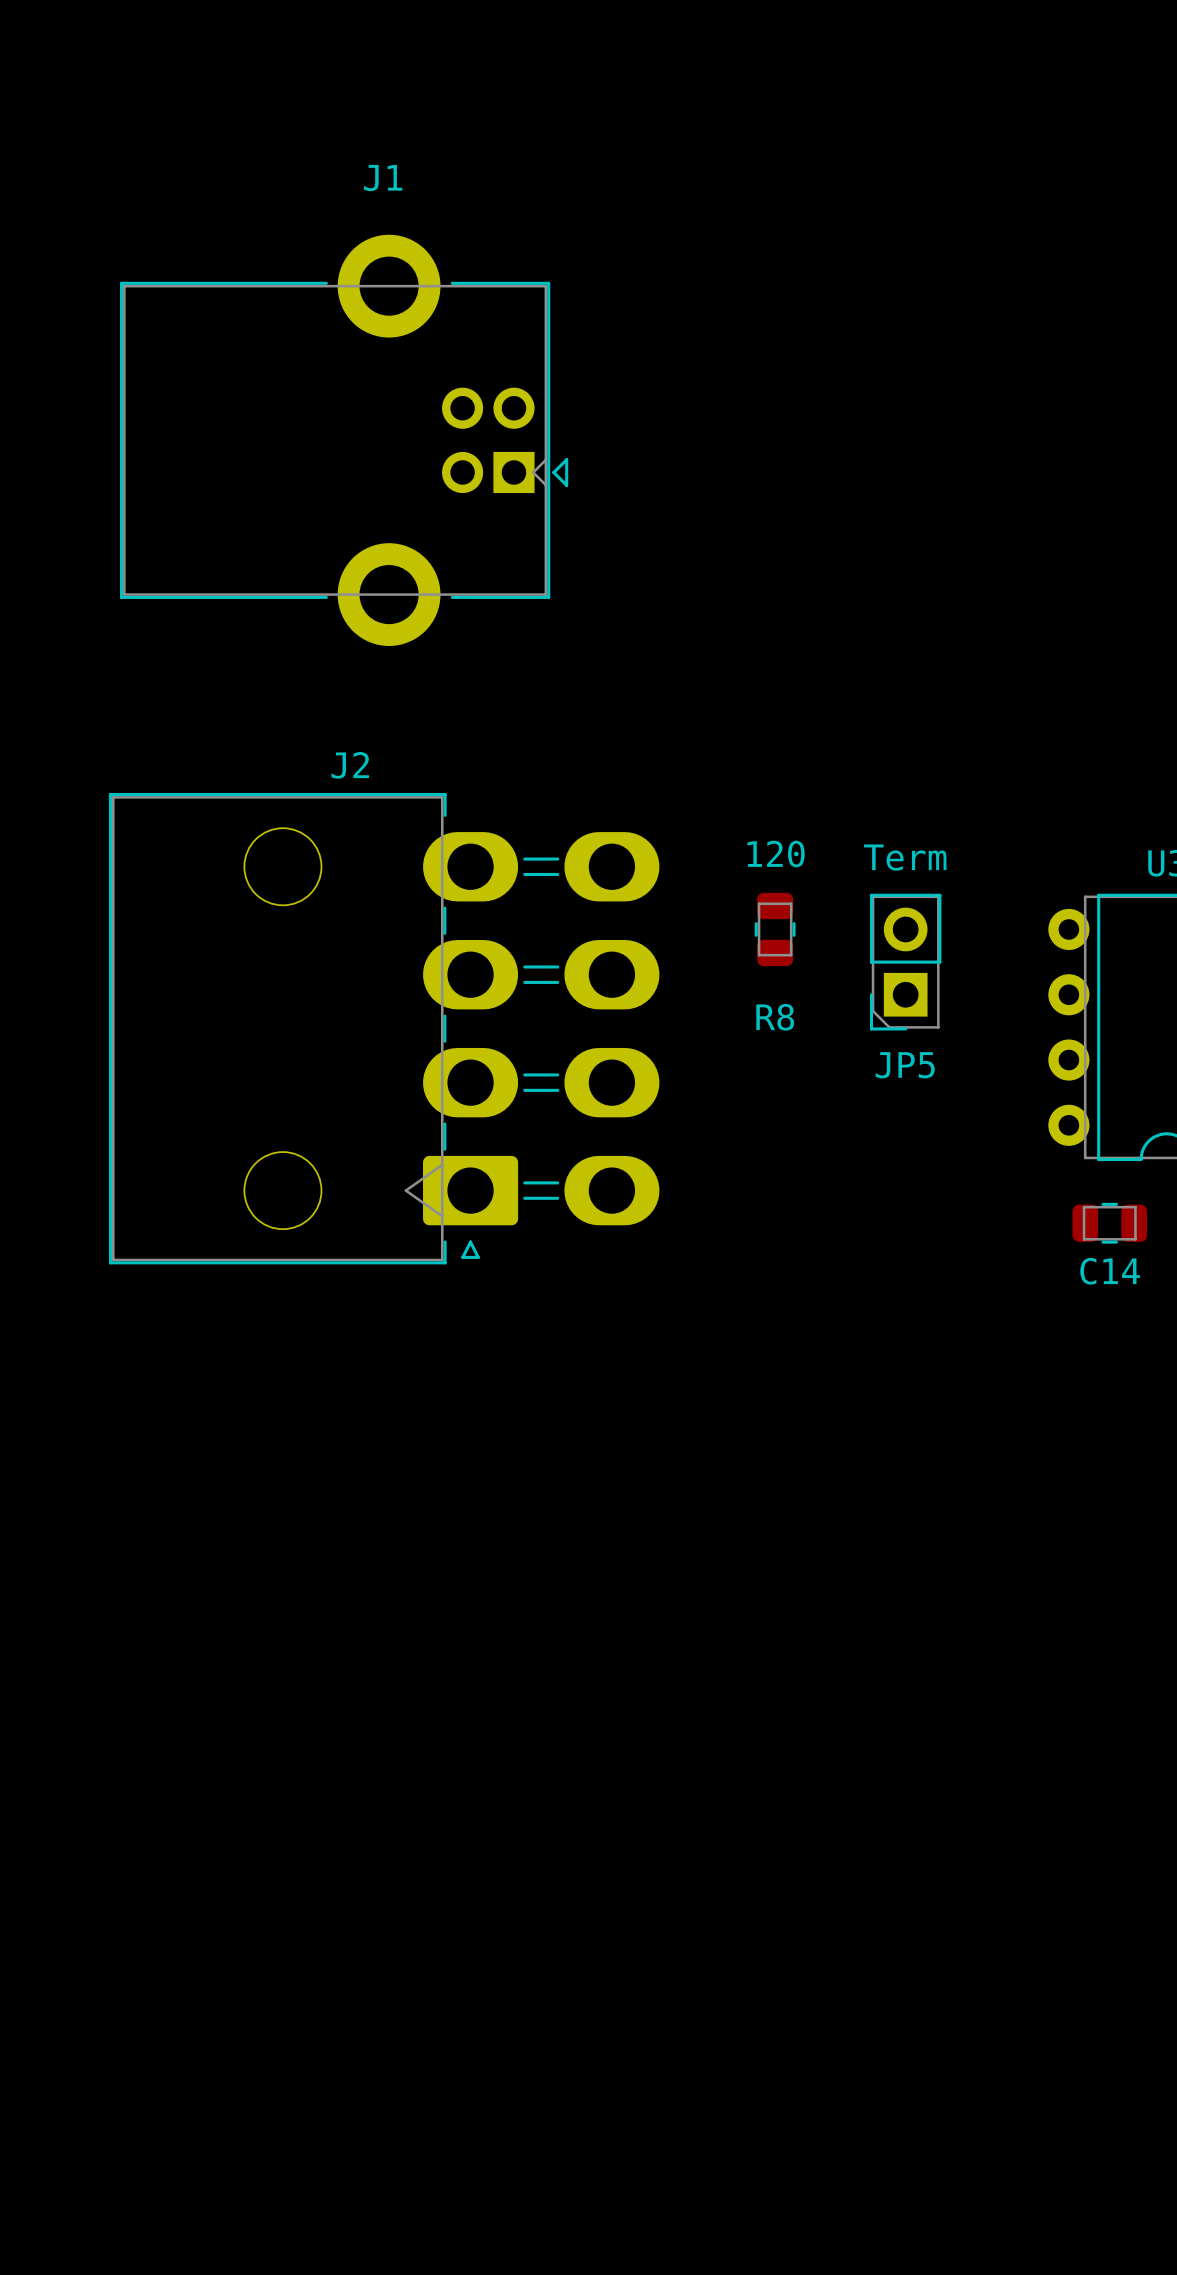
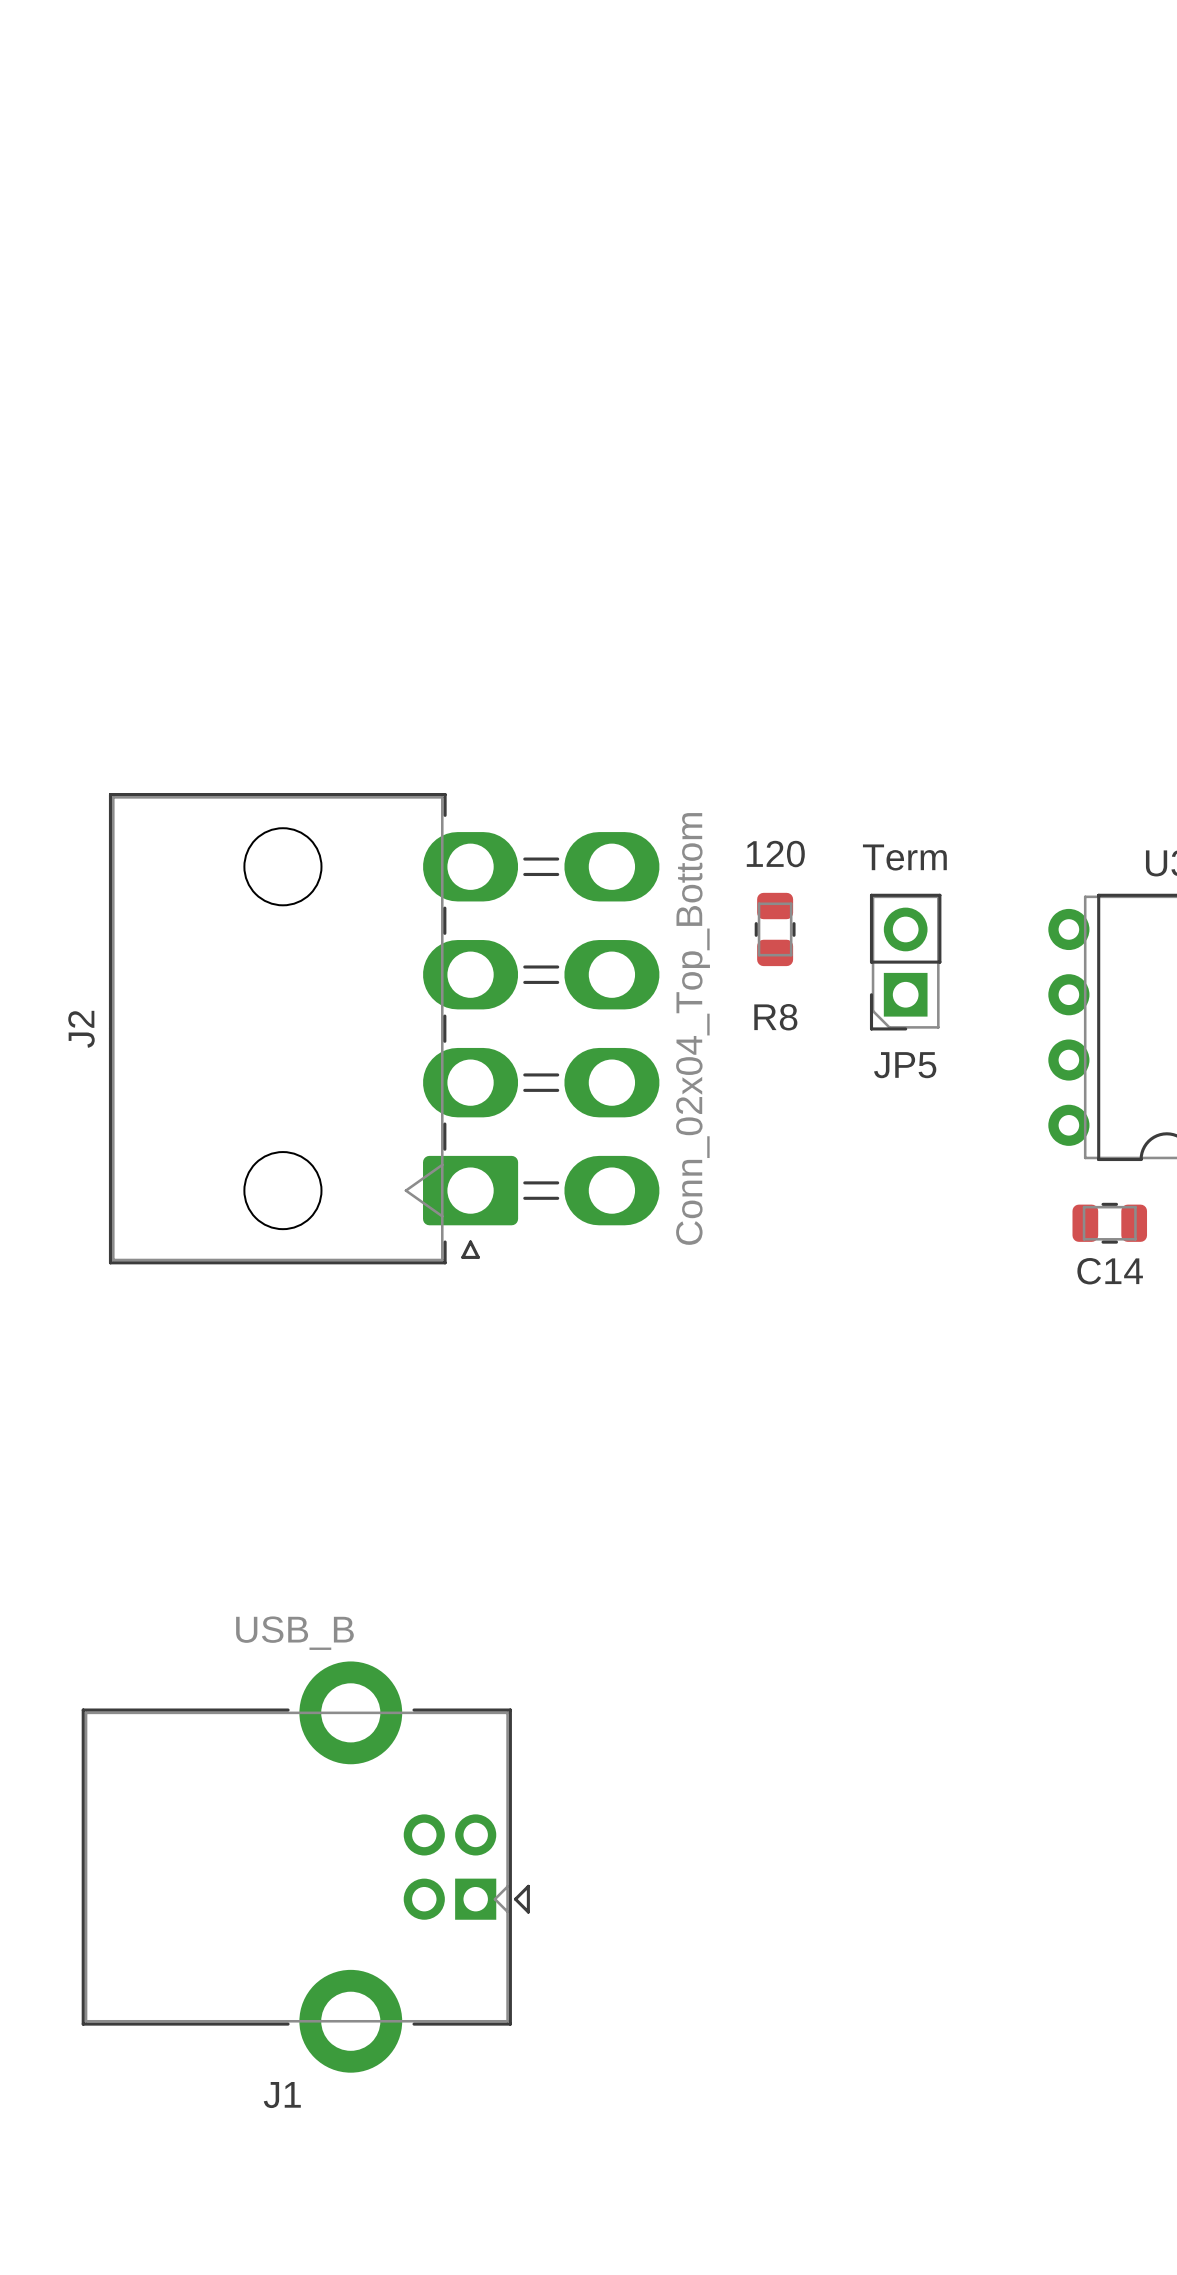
J1 name position: J1 (383, 178) -> J1 (282, 2095)
J1 position: (344, 440) -> (305, 1867)
J2 name rotation: 0° (350, 765) -> 90° counterclockwise (81, 1029)
J2 name position: J2 (350, 765) -> J2 (81, 1029)
J2 value: none -> Conn_02x04_Top_Bottom (693, 1028)
J1 value: none -> USB_B (294, 1633)

